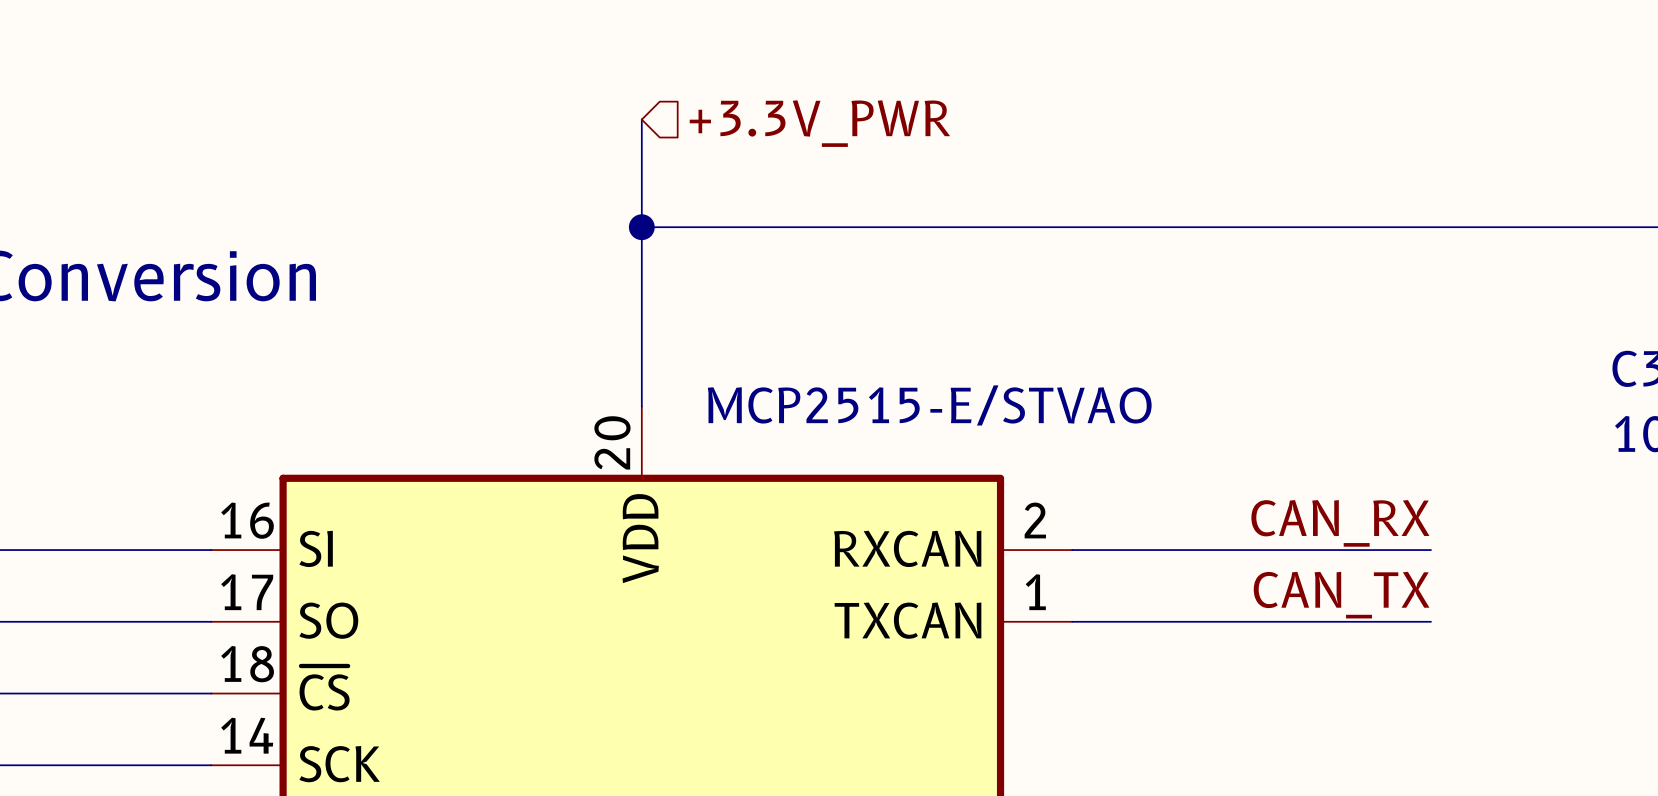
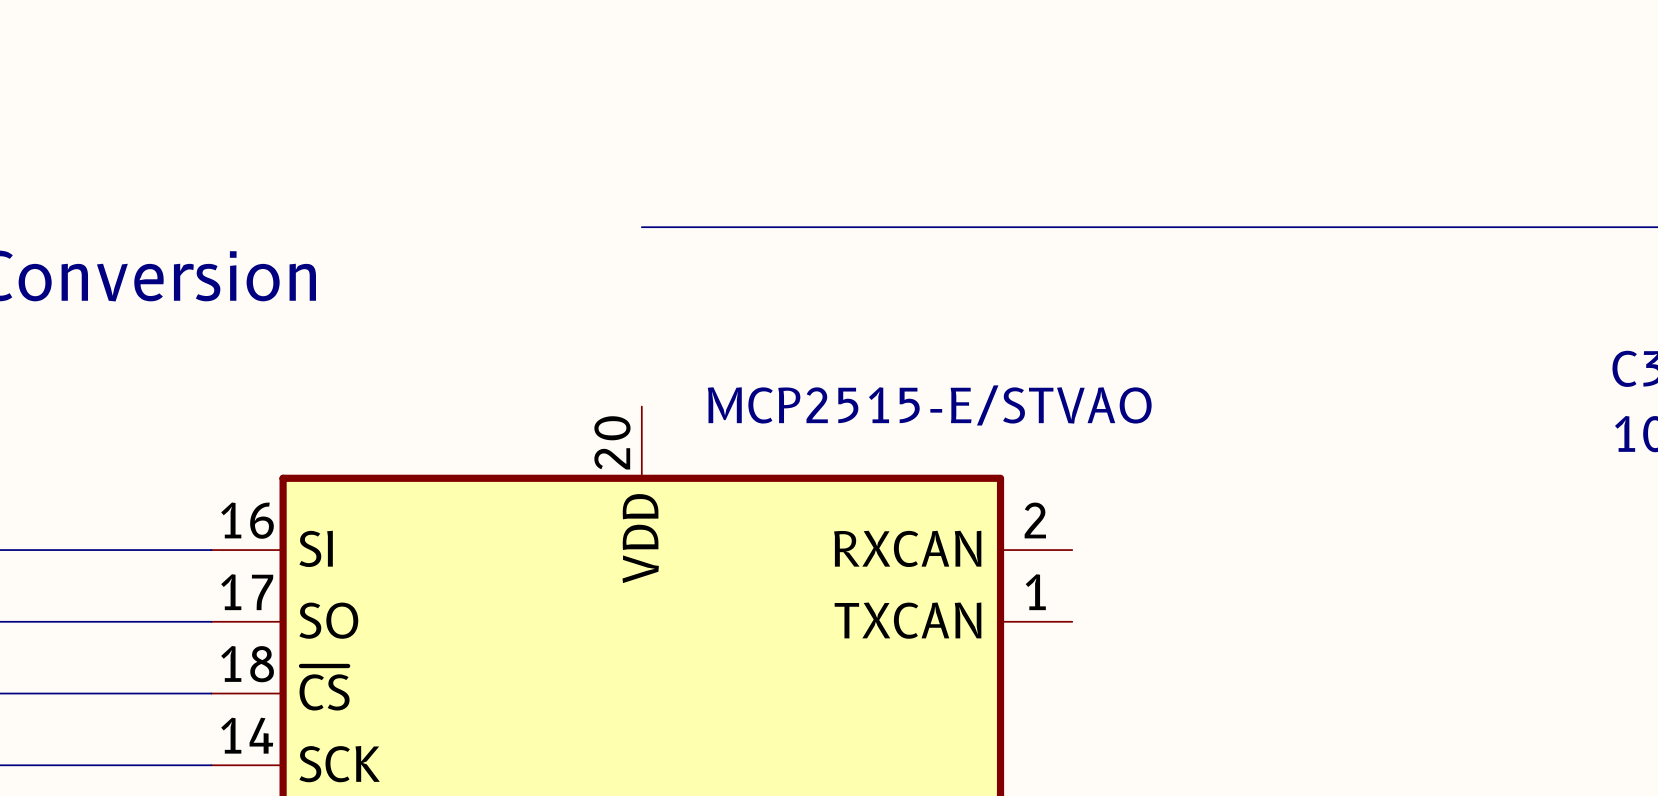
wire: (641, 119) (641, 406) -> none
hierarchical label: +3.3V_PWR (819, 123) -> none
junction: (641, 227) -> none
label: CAN_RX (1340, 523) -> none
wire: (1072, 550) (1430, 550) -> none
label: CAN_TX (1341, 595) -> none
wire: (1072, 621) (1430, 621) -> none

